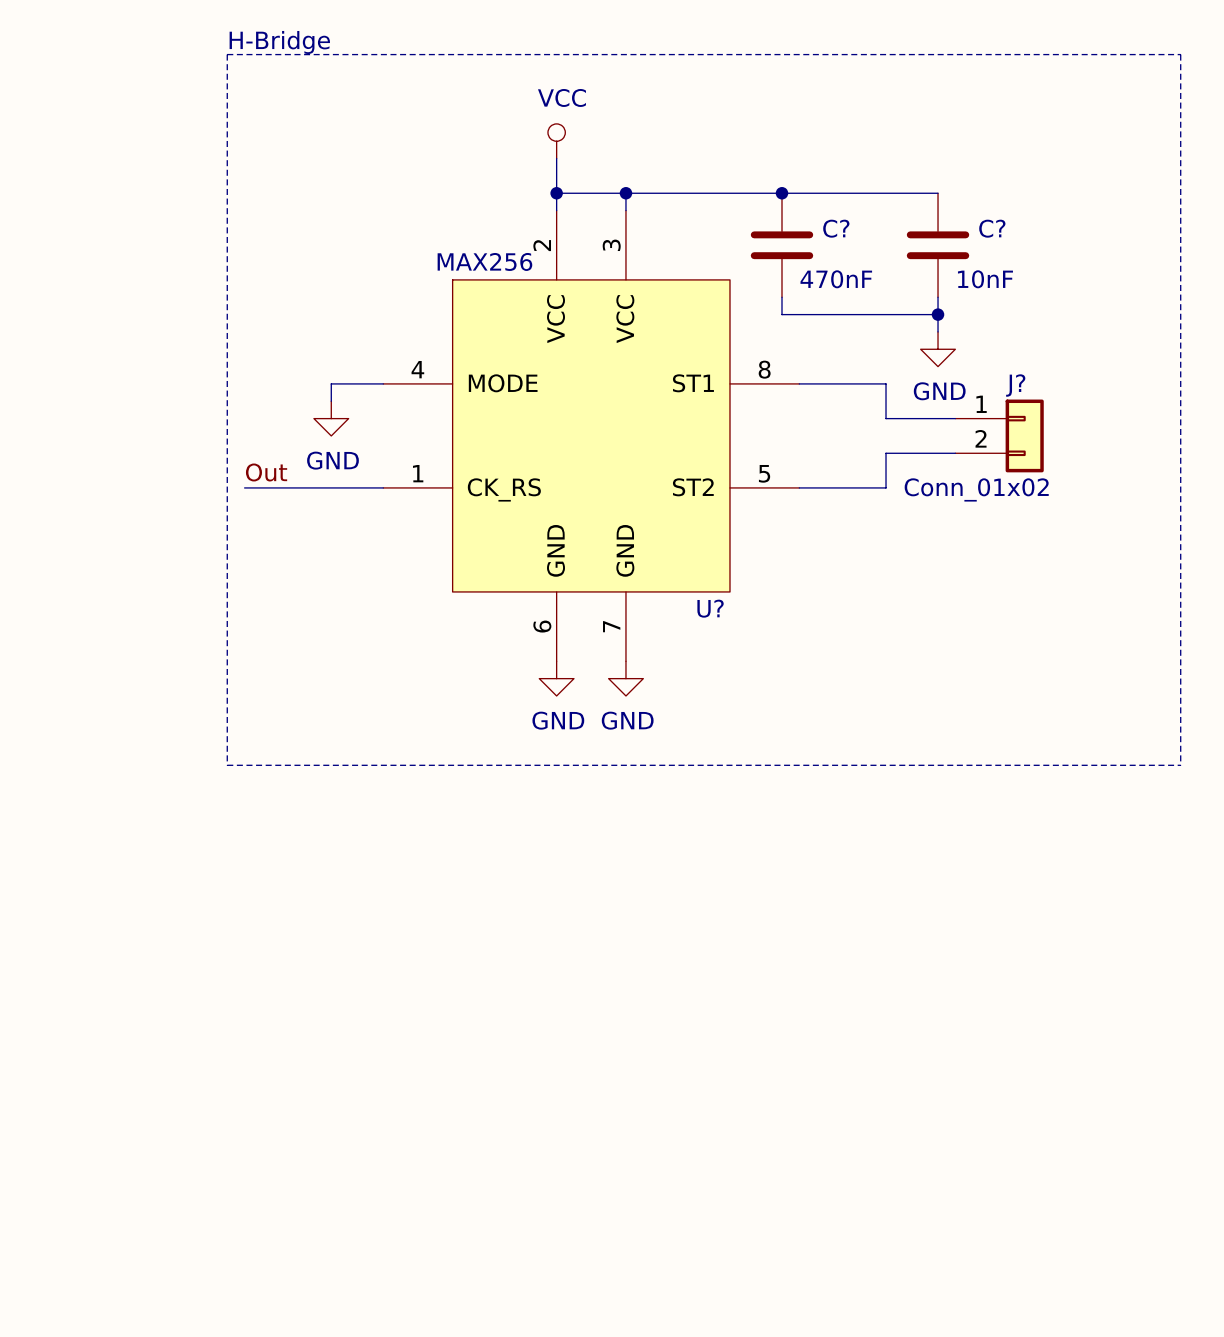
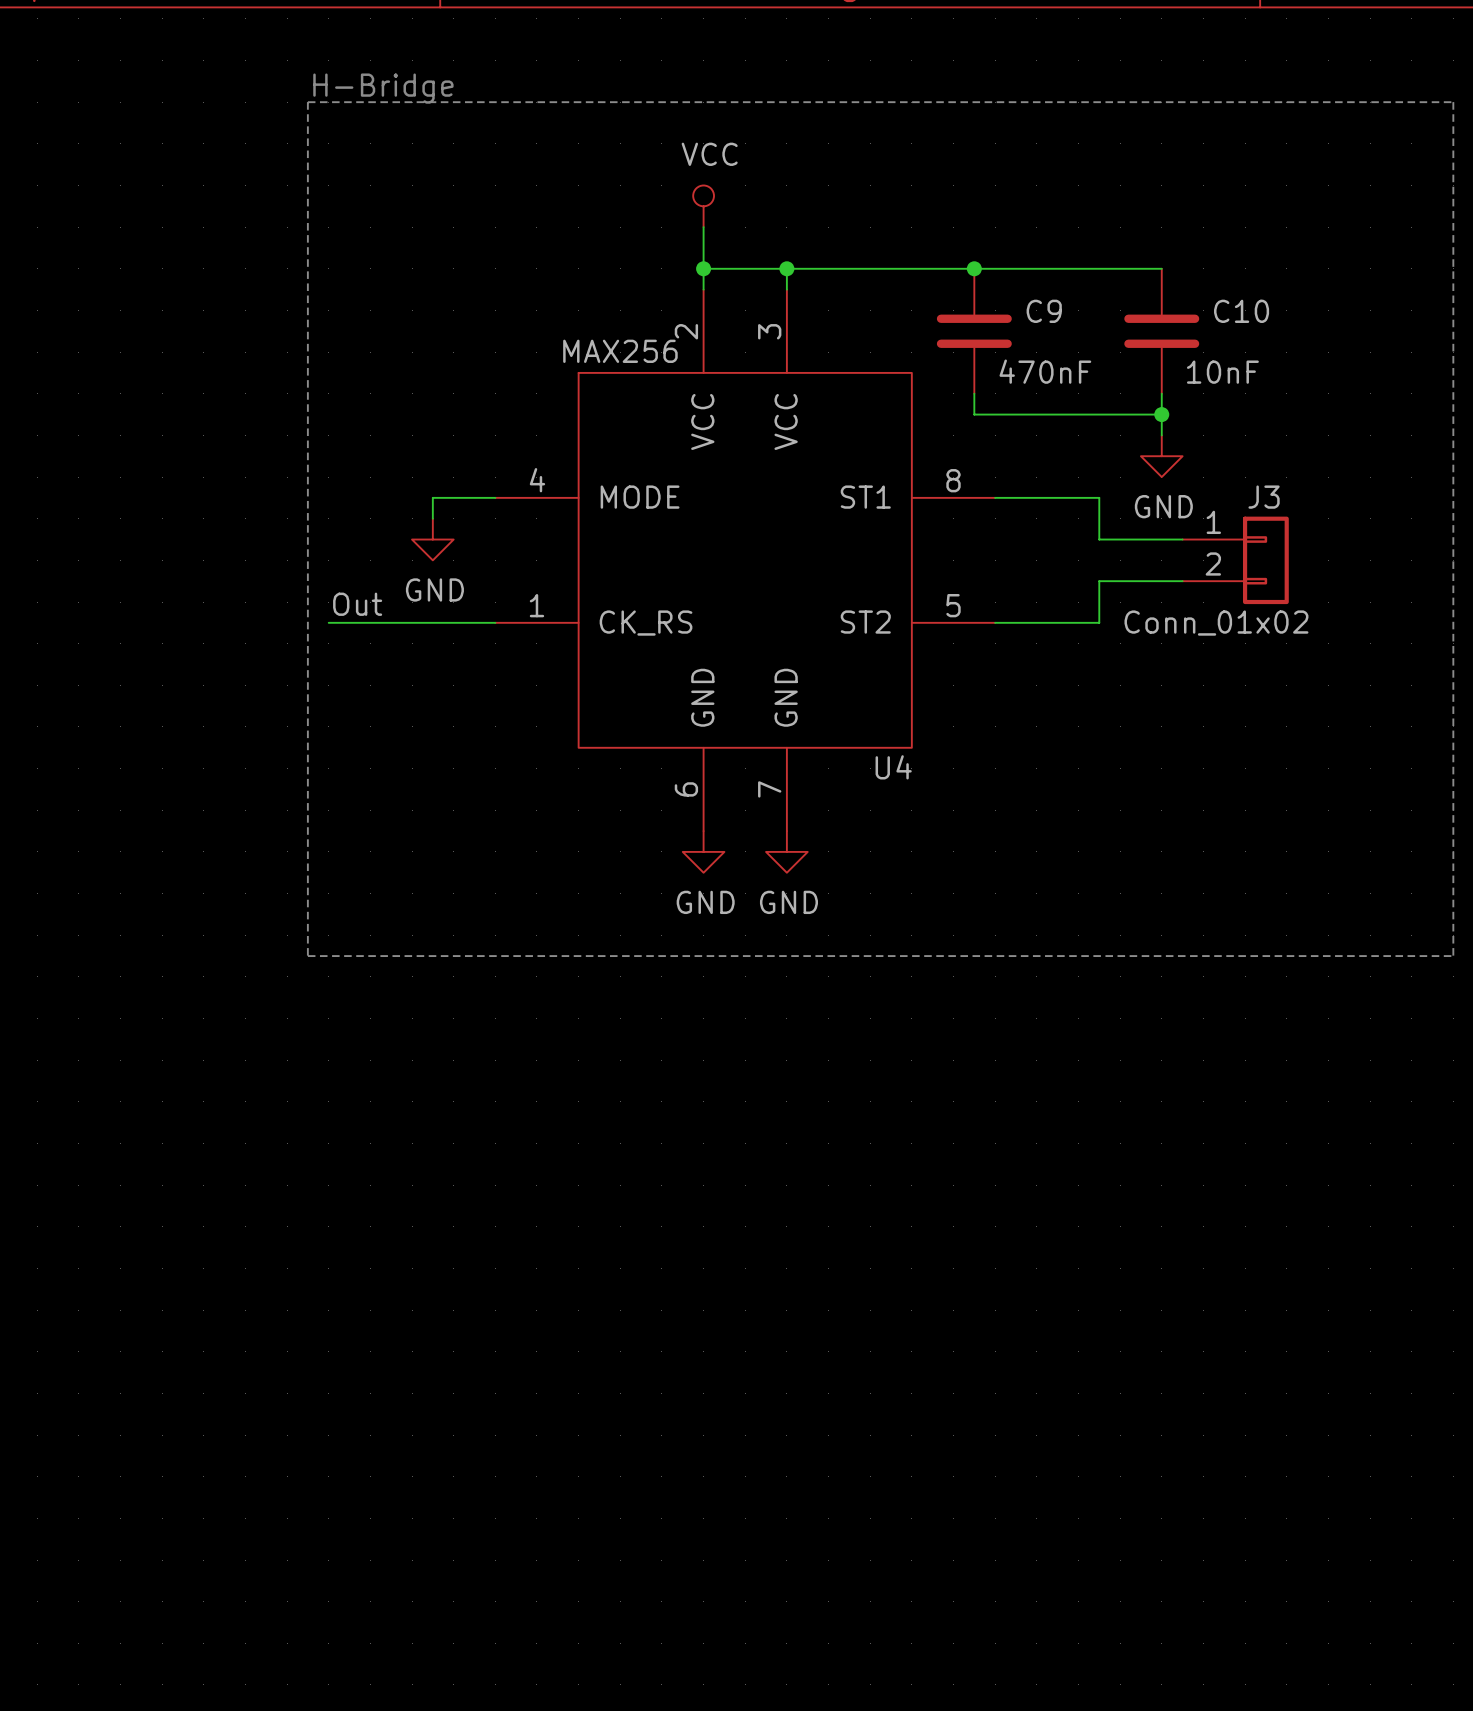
C? name: C? (836, 228) -> C9 (1044, 311)
C? name: C? (992, 228) -> C10 (1241, 311)
J? name: J? (1015, 385) -> J3 (1264, 497)
U? name: U? (710, 608) -> U4 (893, 767)

